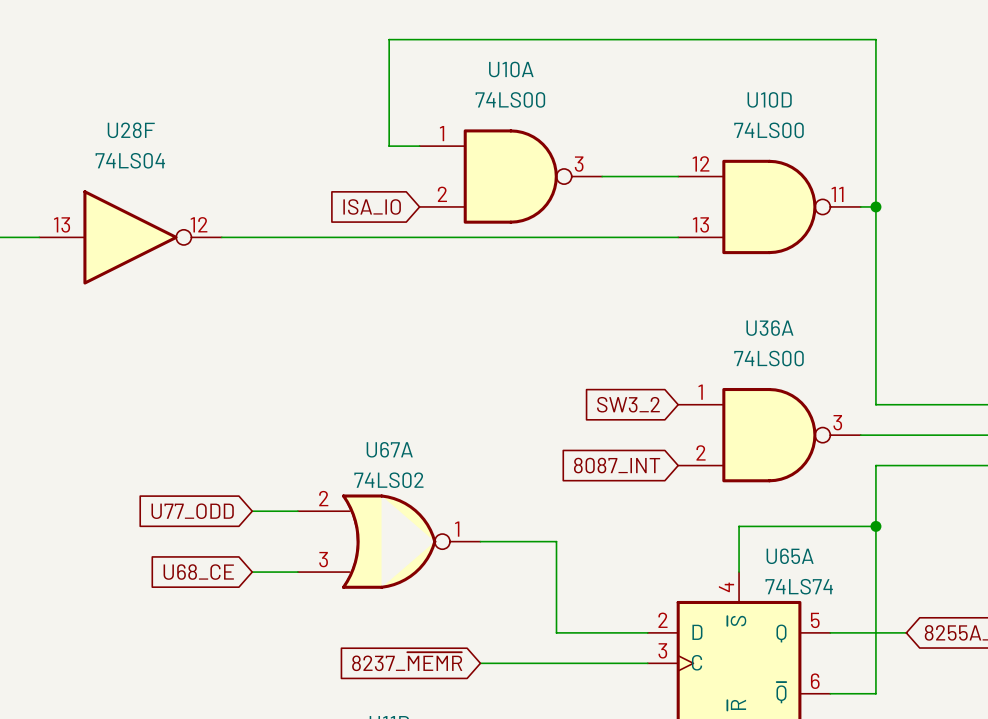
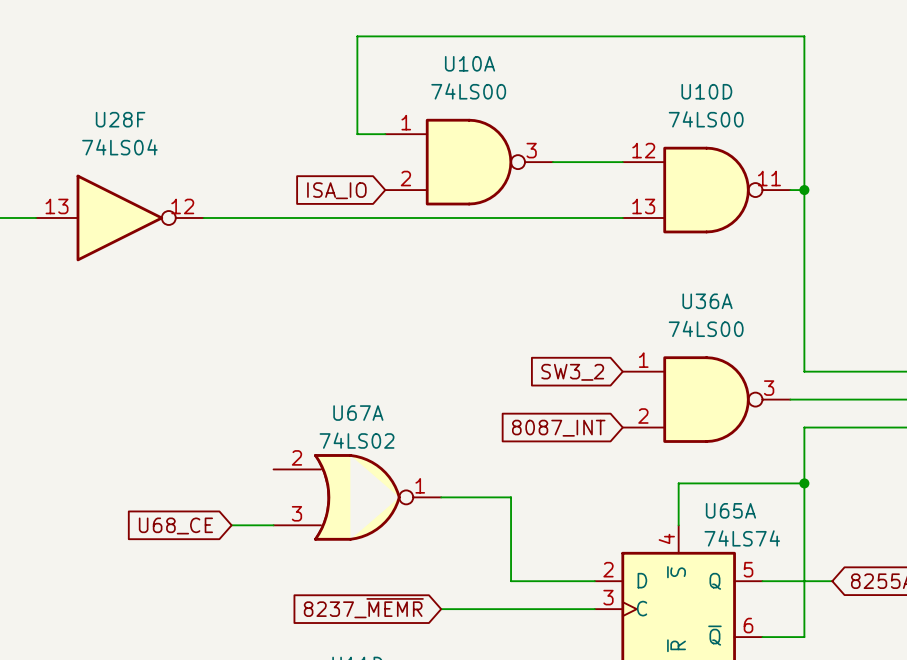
global label: U77_ODD (192, 511) -> none
wire: (252, 511) (297, 511) -> none

